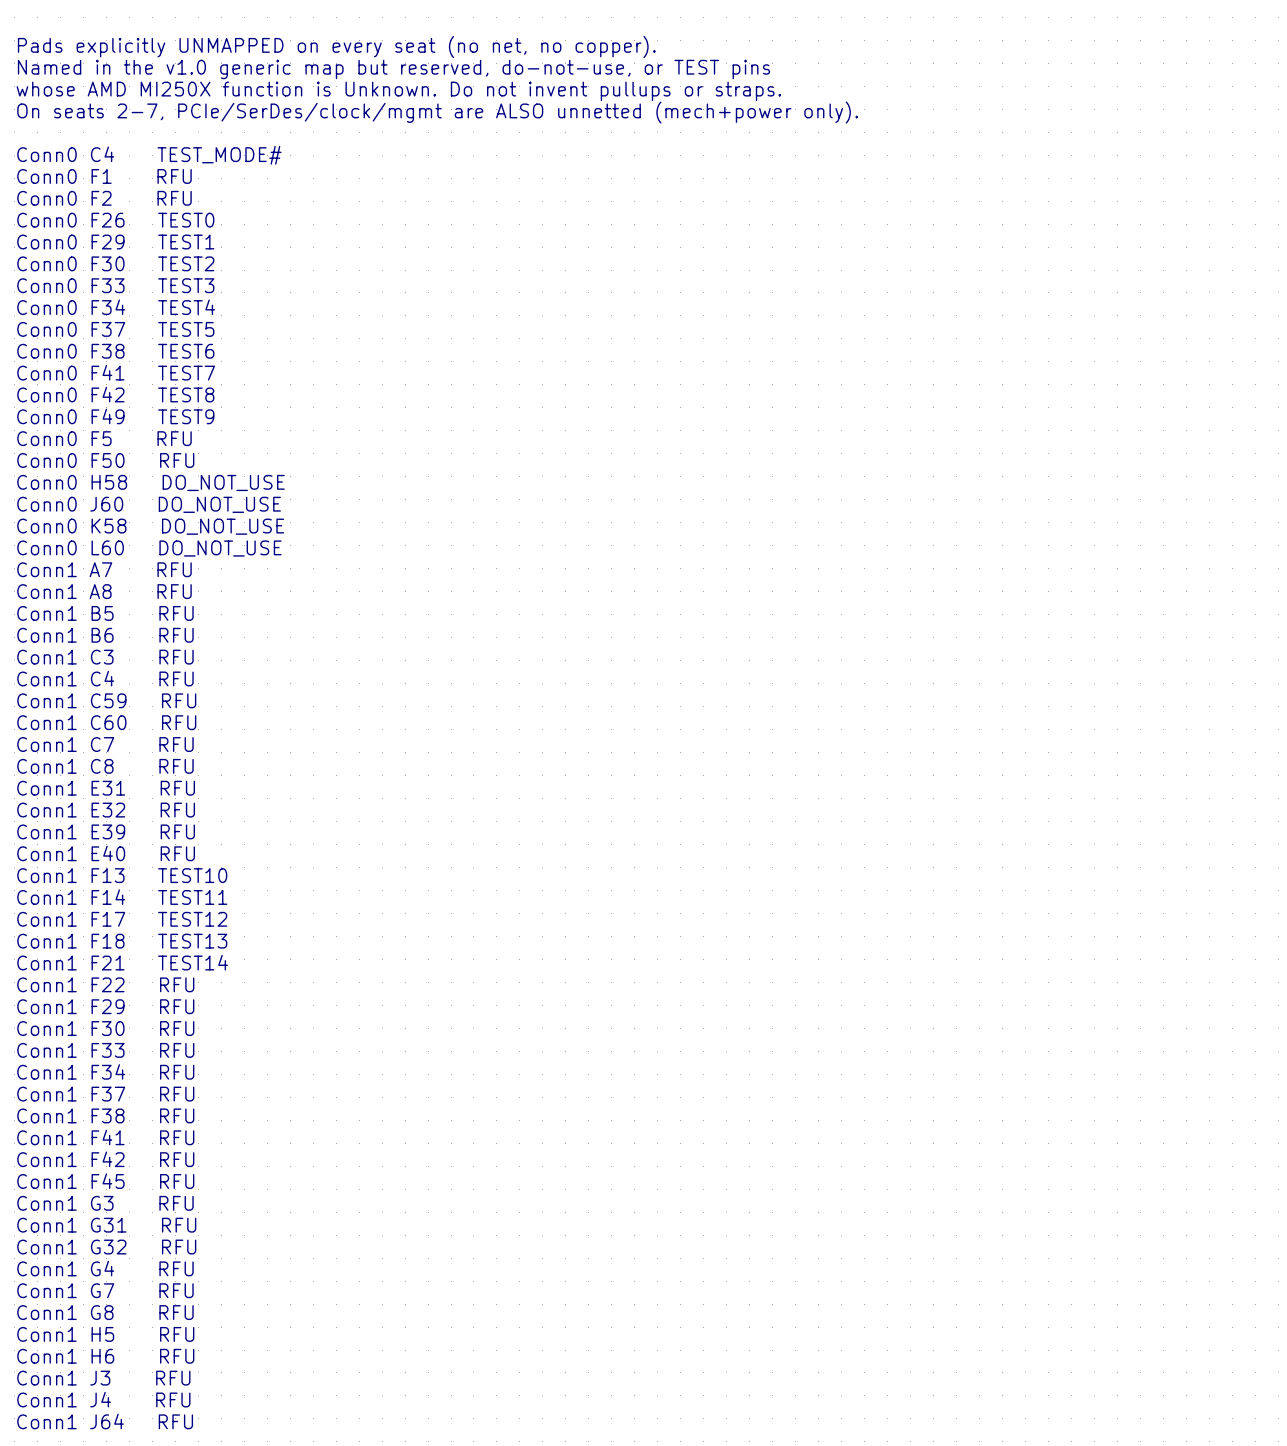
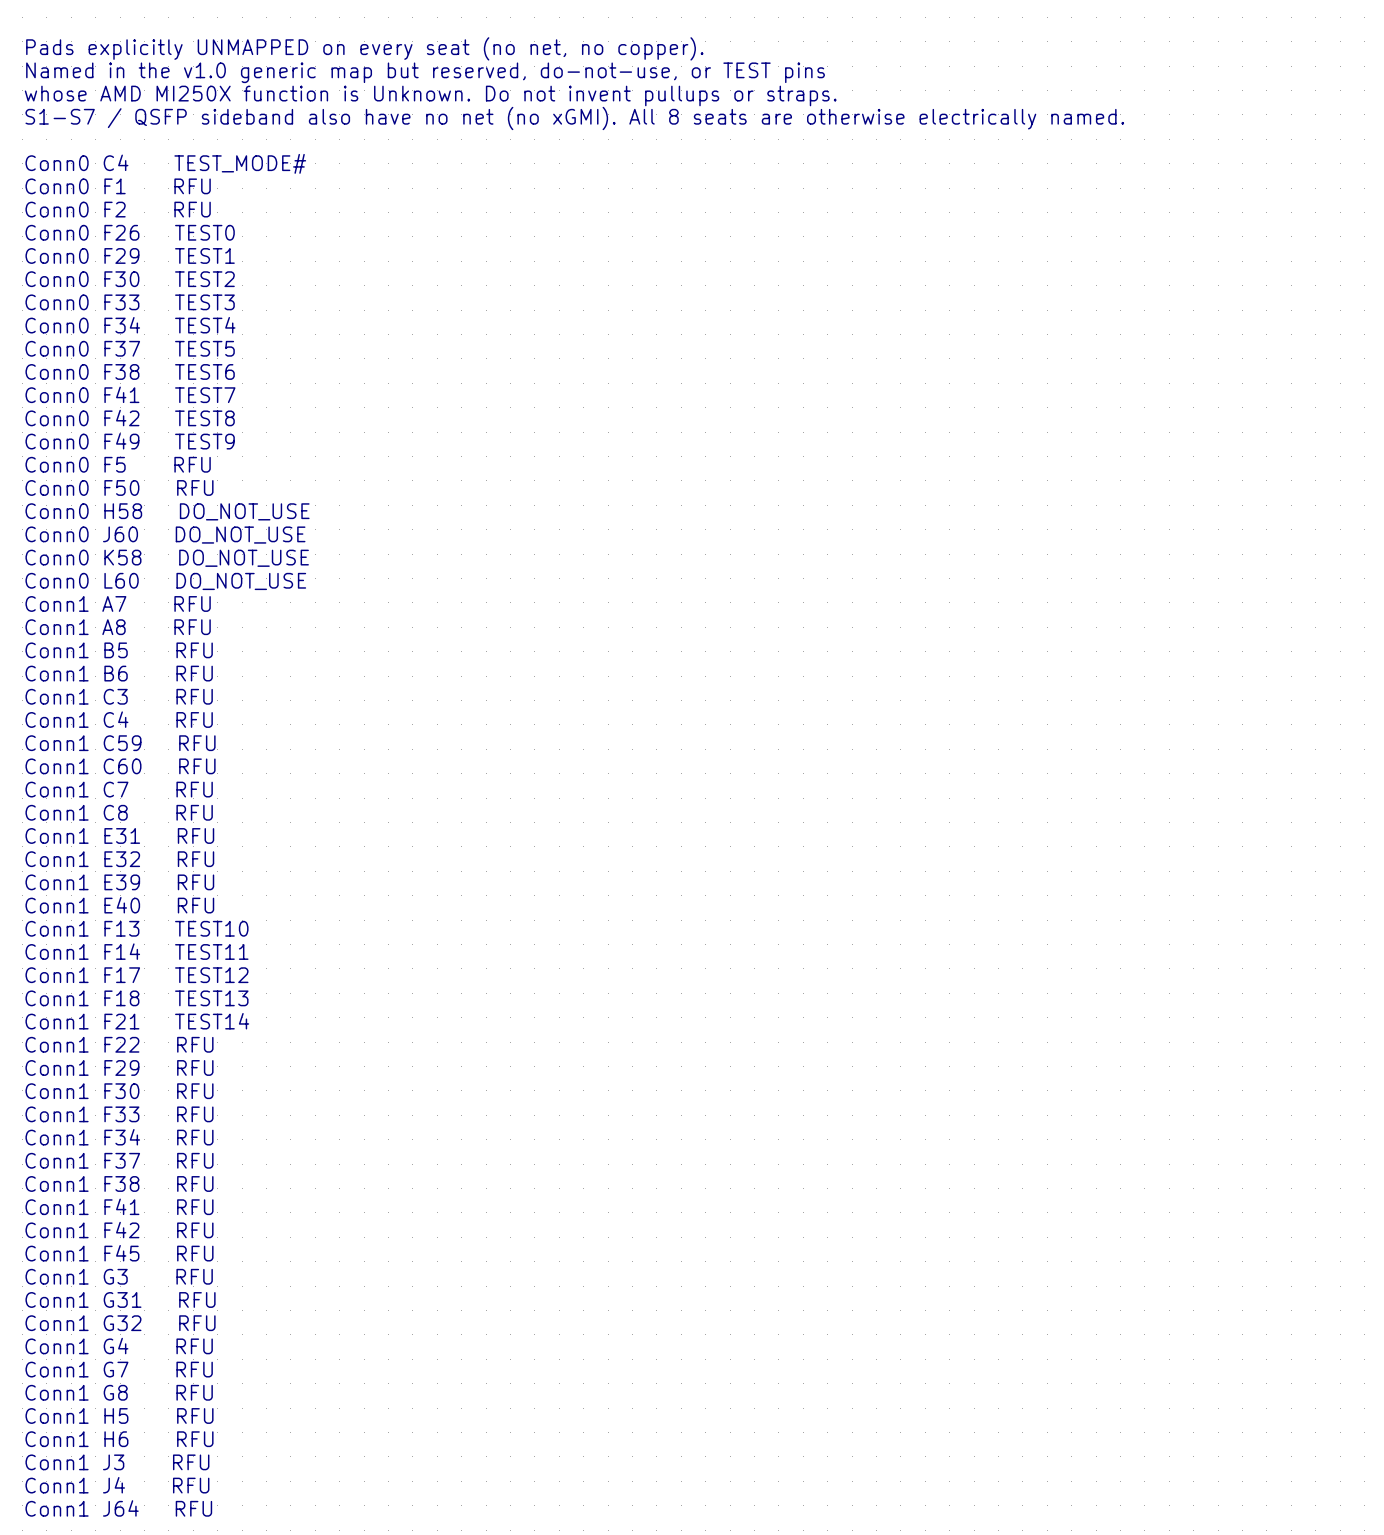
text: On seats 2-7, PCIe/SerDes/clock/mgmt are ALSO unnetted (mech+power only). (437, 112) -> S1-S7 / QSFP sideband also have no net (no xGMI). All 8 seats are otherwise electrically named. (574, 118)

